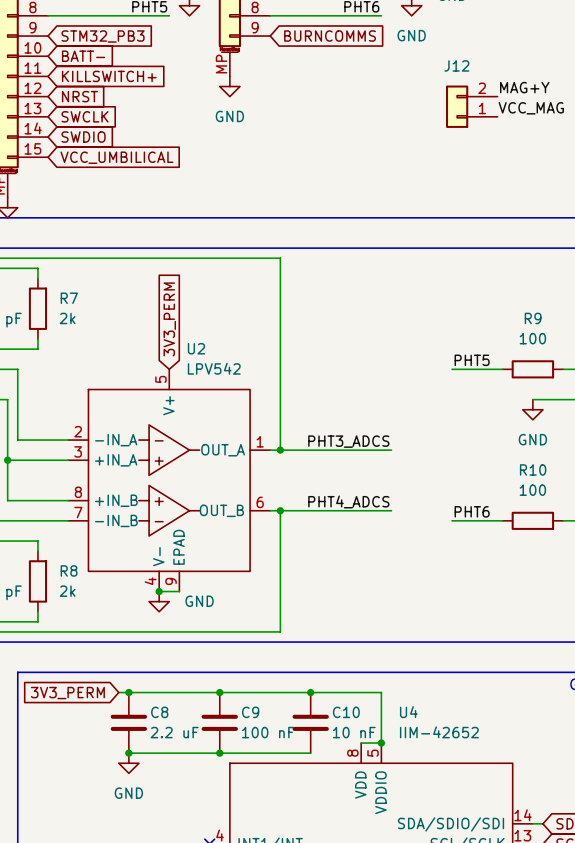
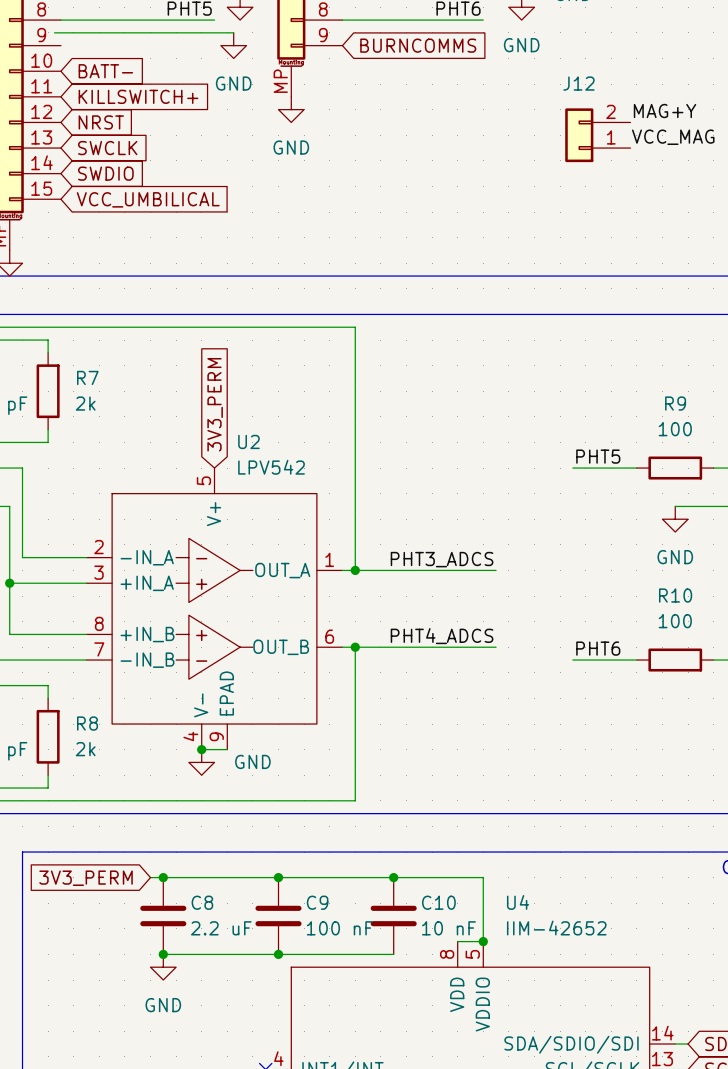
wire: none -> (54, 32) (233, 32)
global label: STM32_PB3 (103, 36) -> none
power symbol: none -> GND (233, 45)

